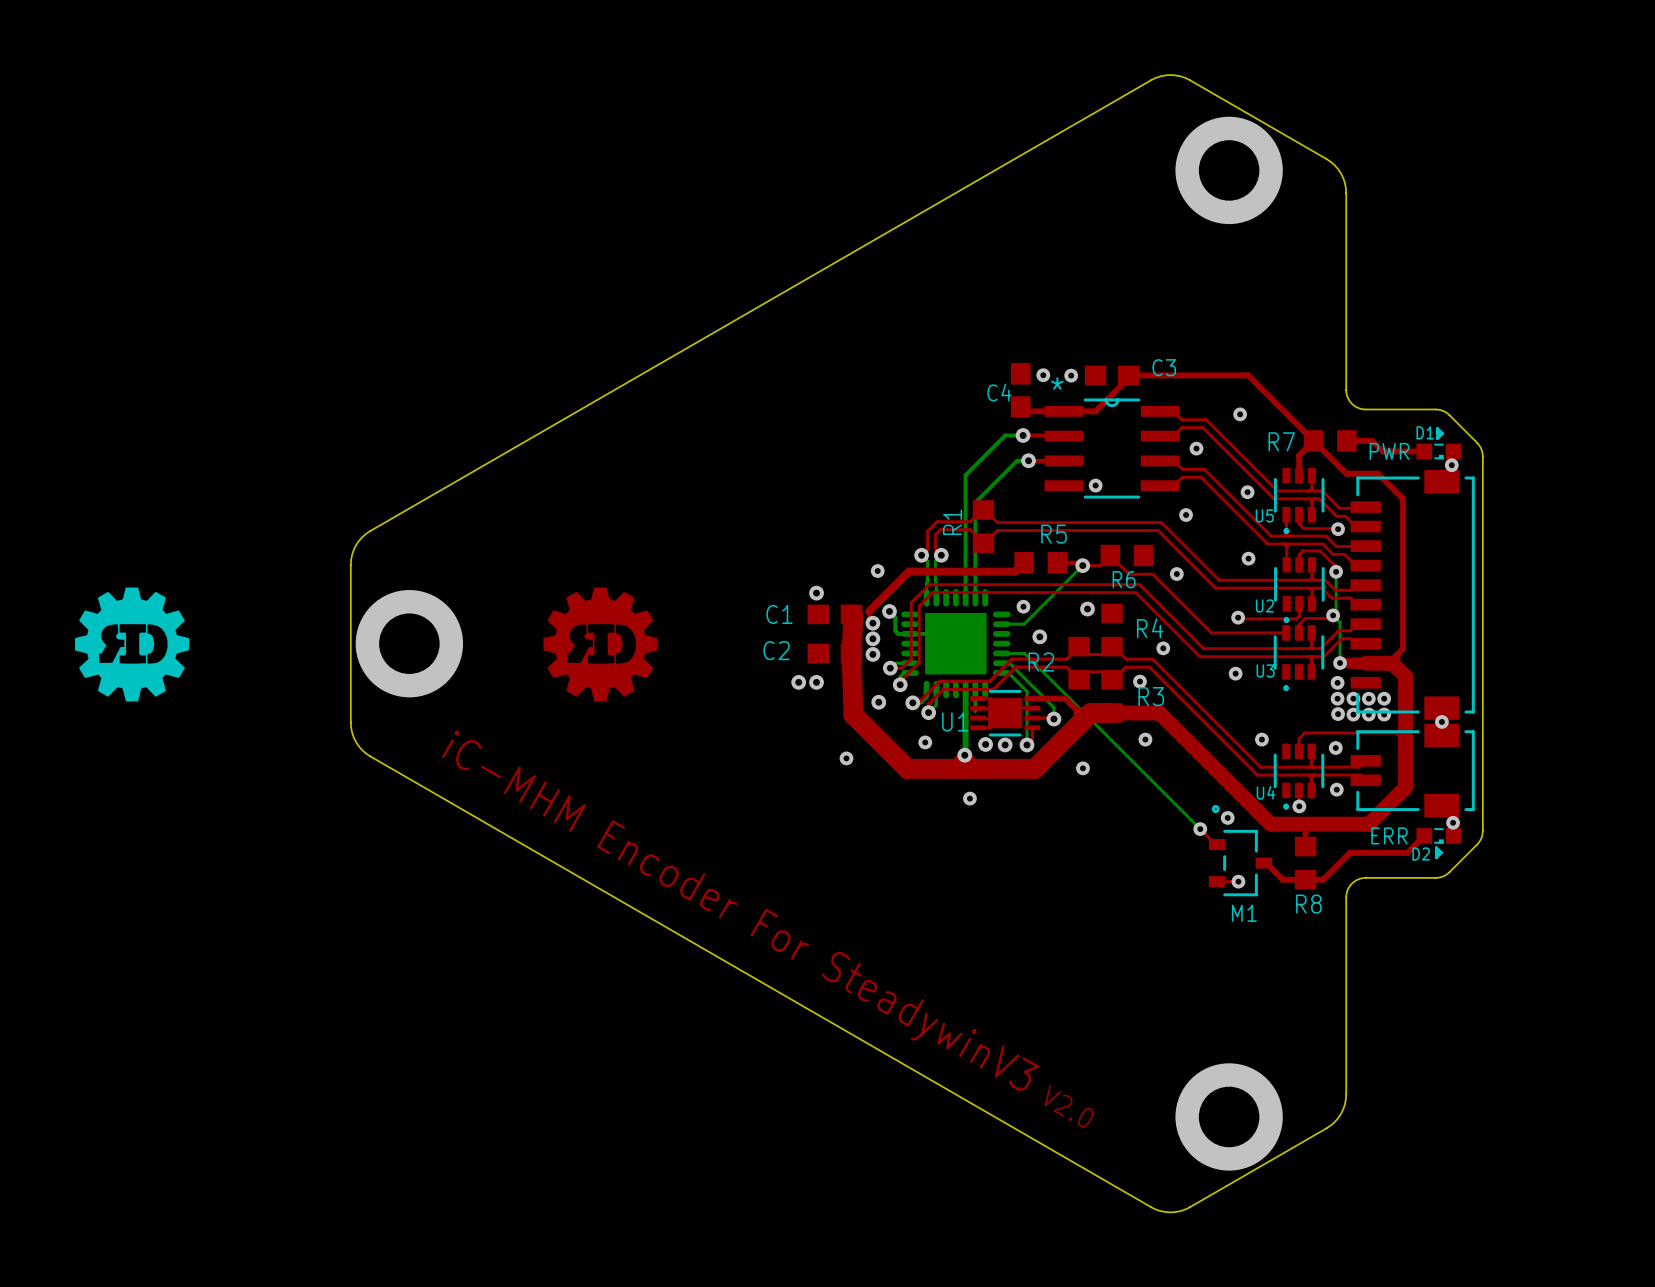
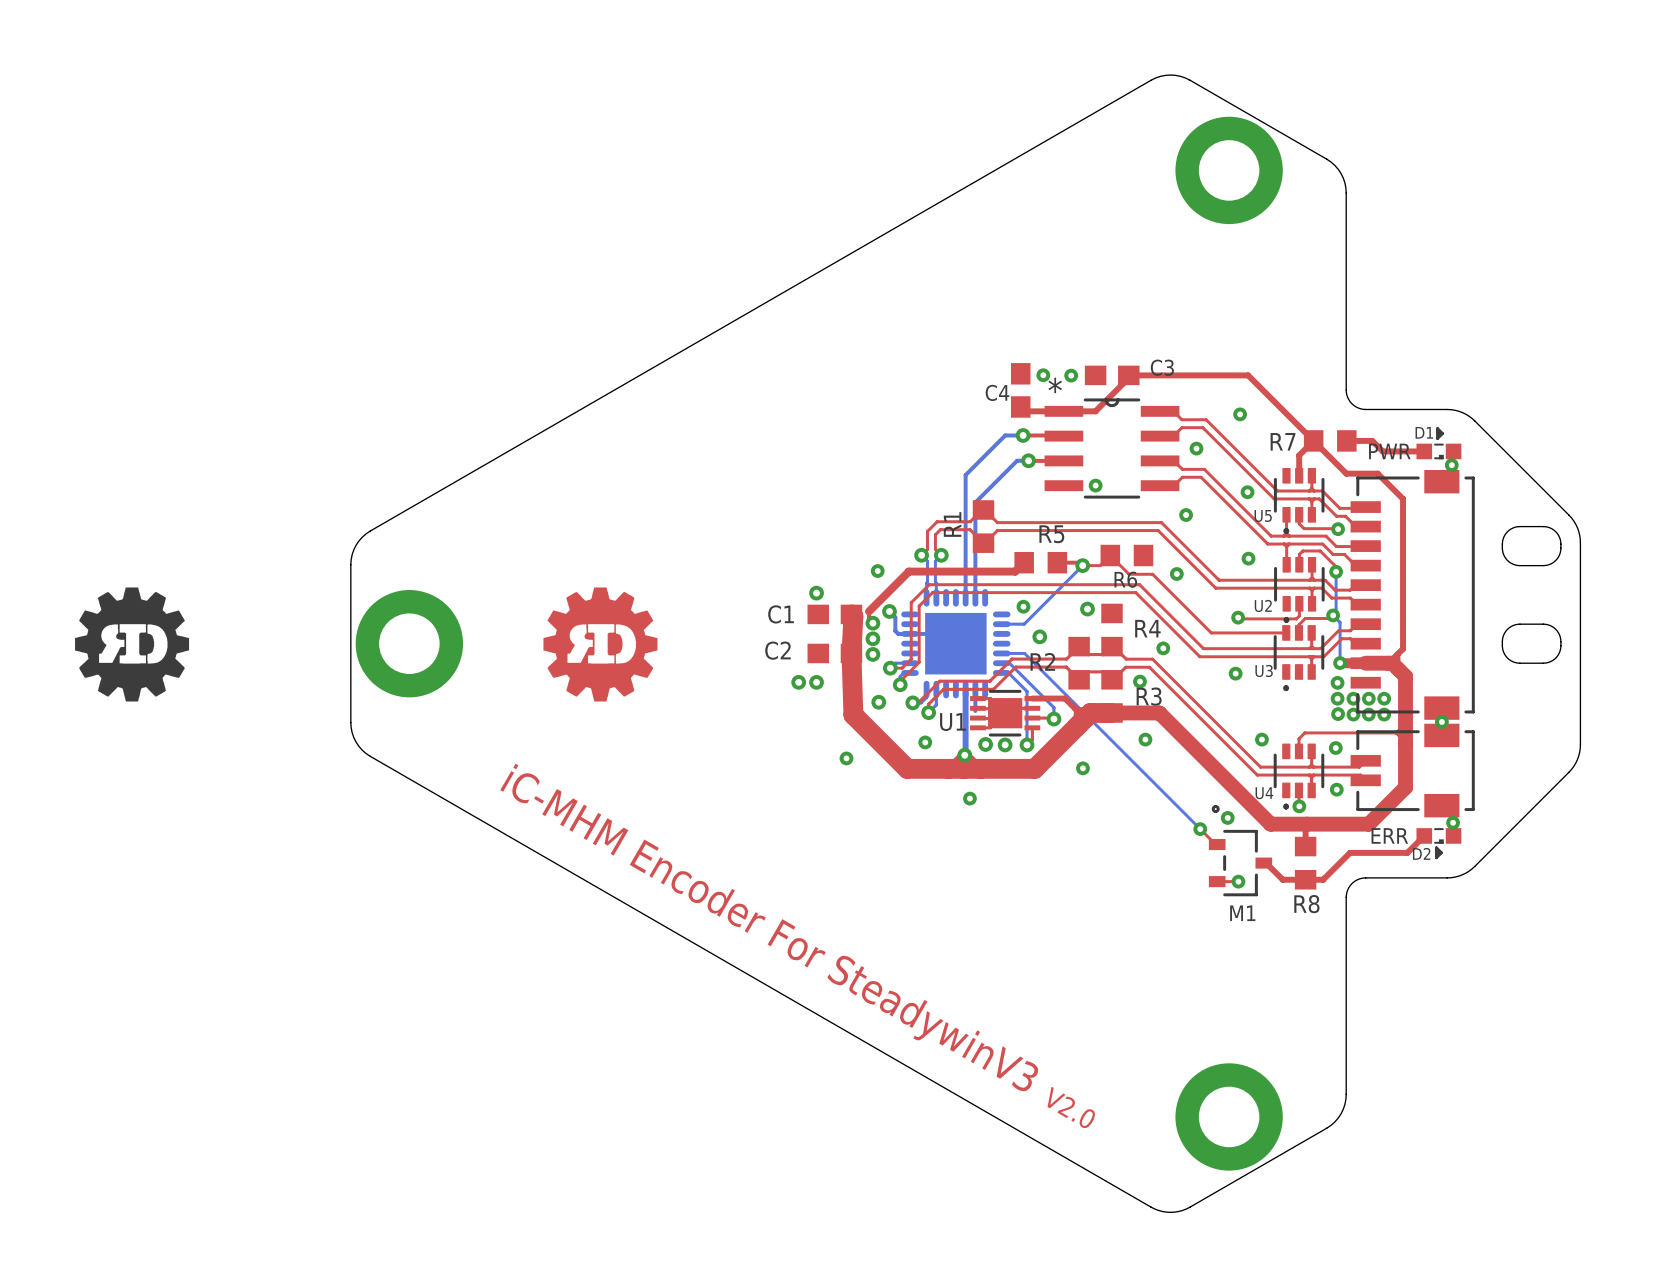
board edge: (1435, 409) (1449, 415) (1478, 444) (1482, 456) (1482, 833) (1478, 842) (1449, 872) (1435, 877) -> (1435, 409) (1458, 411) (1474, 420) (1571, 517) (1577, 527) (1580, 542) (1580, 744) (1577, 759) (1568, 772) (1471, 869) (1454, 877) (1435, 877)
board edge: none -> (1519, 526) (1545, 526) (1555, 531) (1560, 544) (1560, 552) (1555, 560) (1543, 565) (1517, 565) (1507, 560) (1502, 550) (1503, 537) (1509, 530) (1519, 526)
board edge: none -> (1519, 624) (1545, 624) (1555, 629) (1560, 641) (1560, 650) (1555, 658) (1543, 663) (1517, 663) (1507, 658) (1502, 647) (1503, 635) (1509, 627) (1519, 624)

